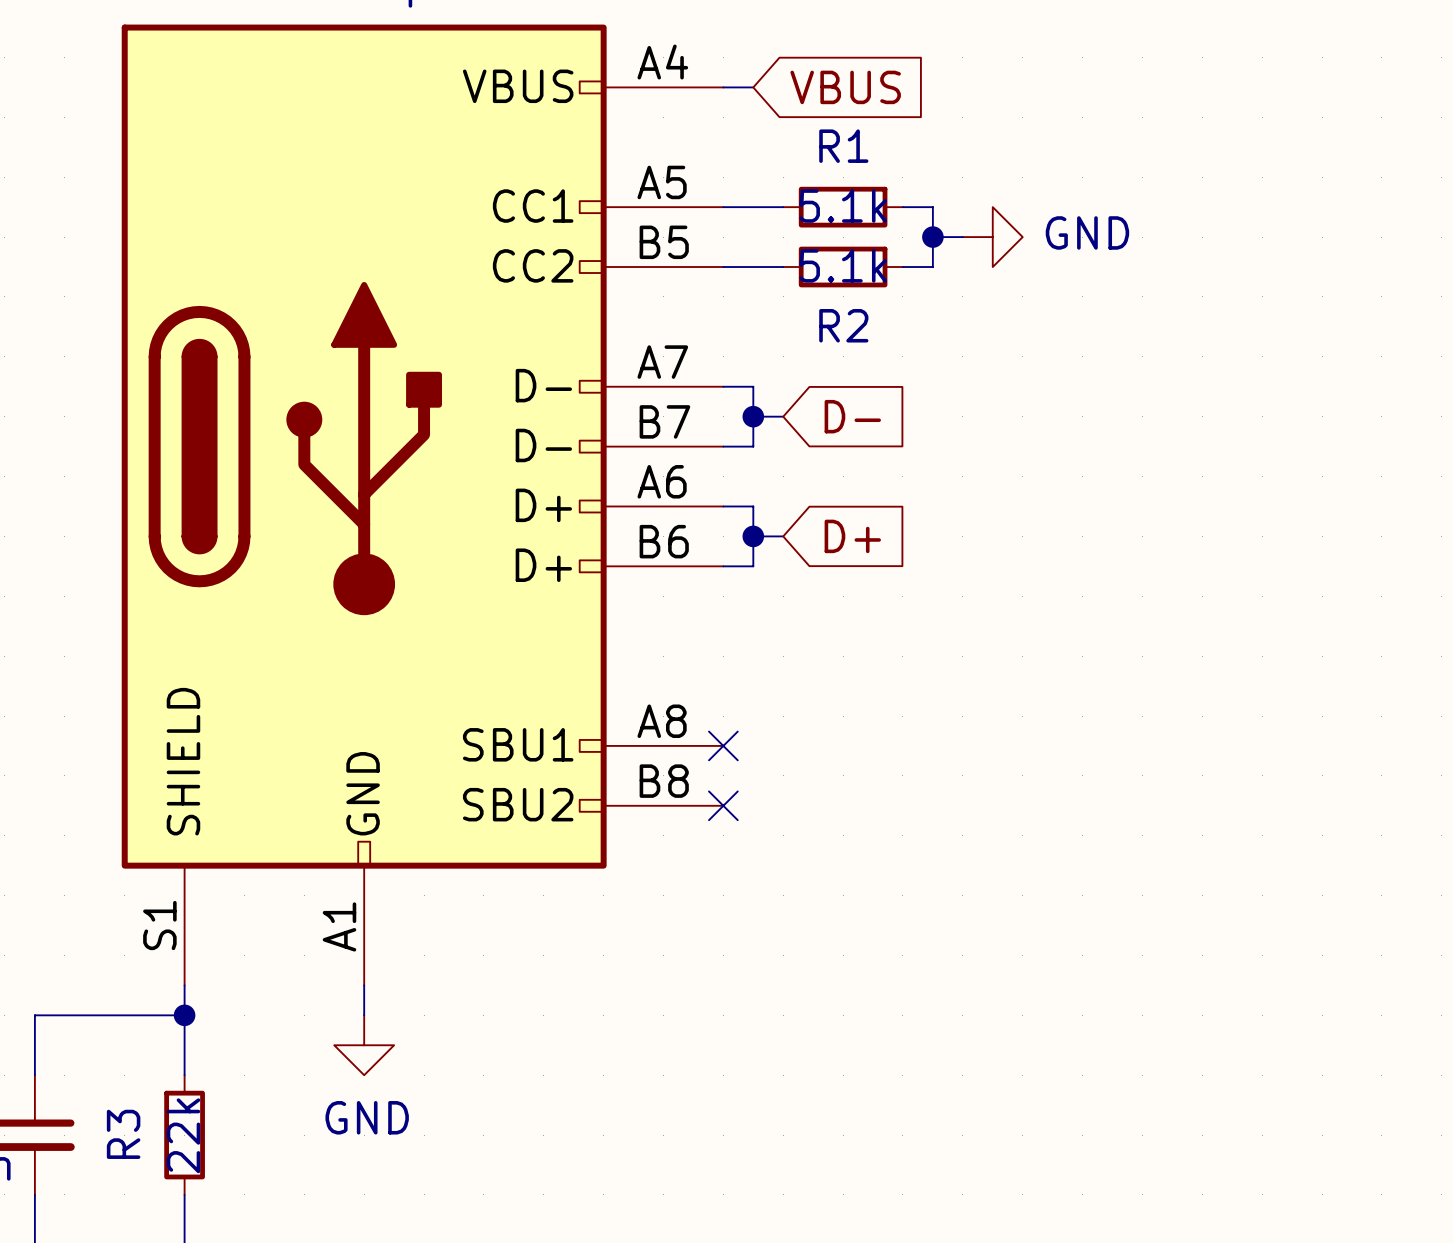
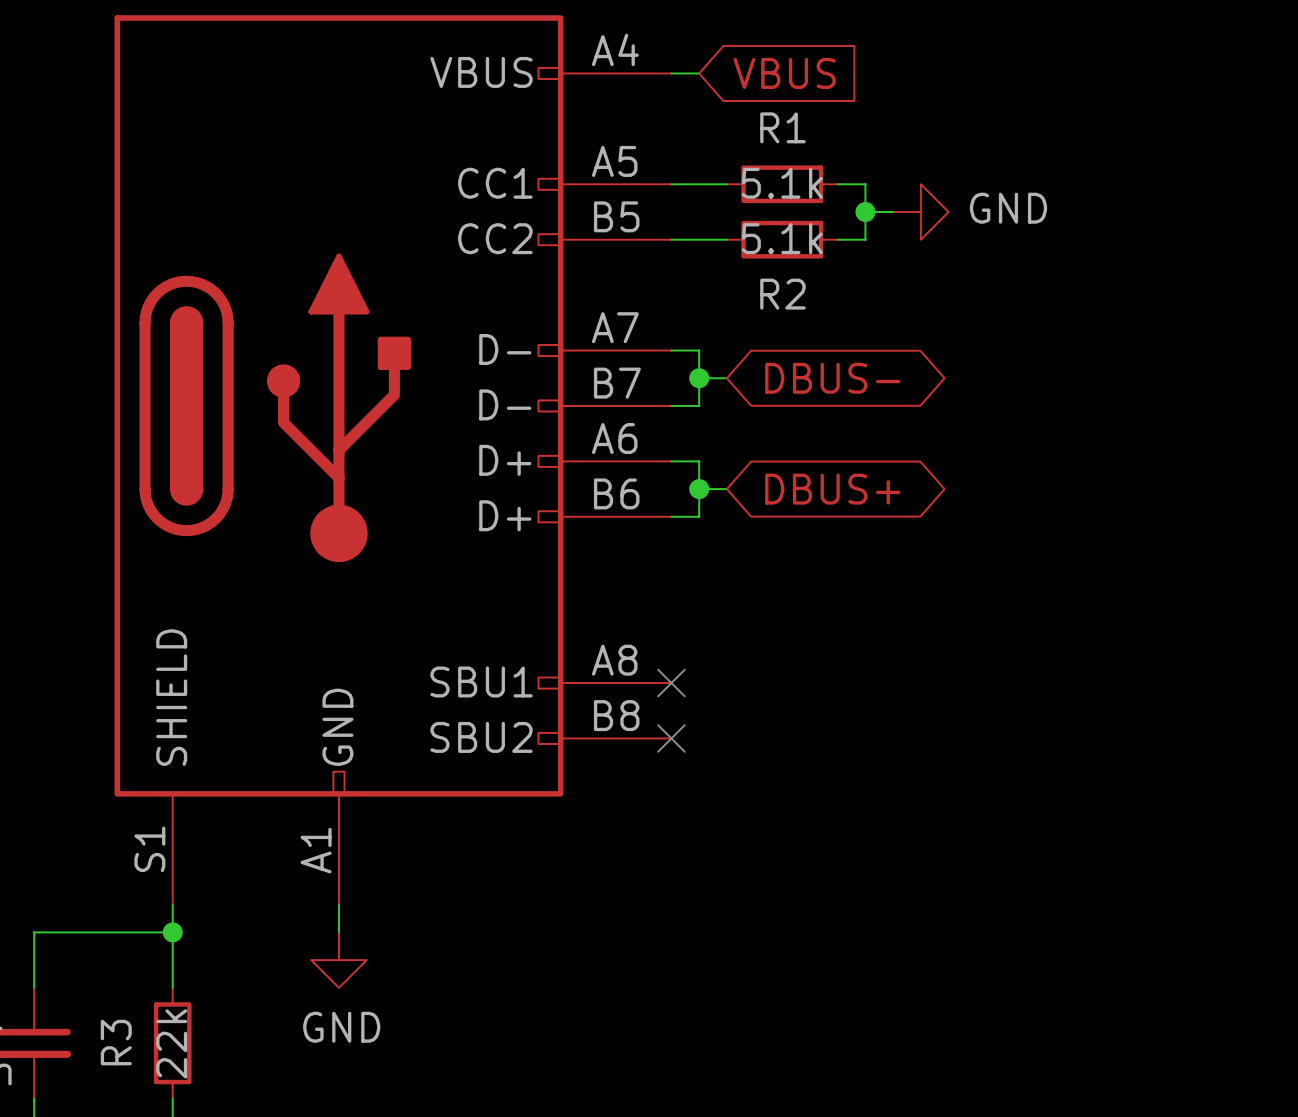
global label shape: input (852, 416) -> bidirectional (832, 378)
global label: D- (852, 416) -> DBUS- (832, 378)
global label shape: input (852, 536) -> bidirectional (832, 489)
global label: D+ (852, 536) -> DBUS+ (832, 489)

